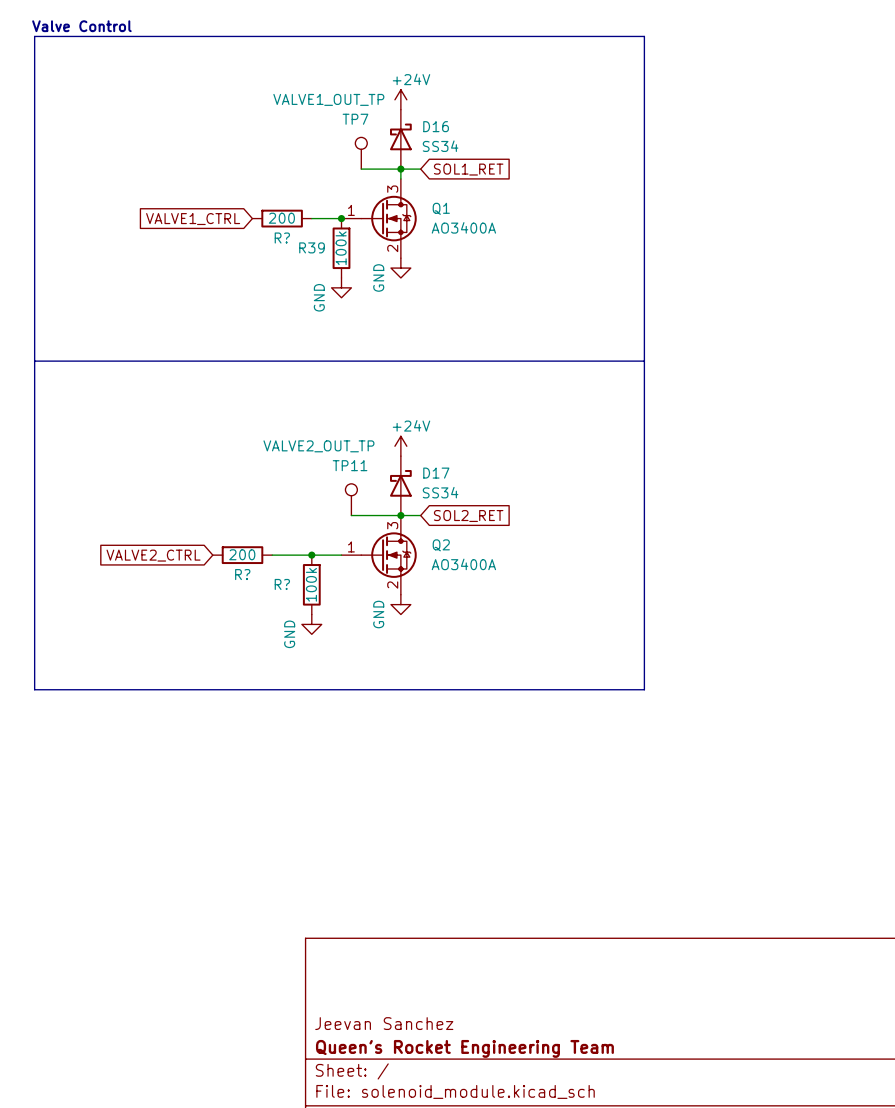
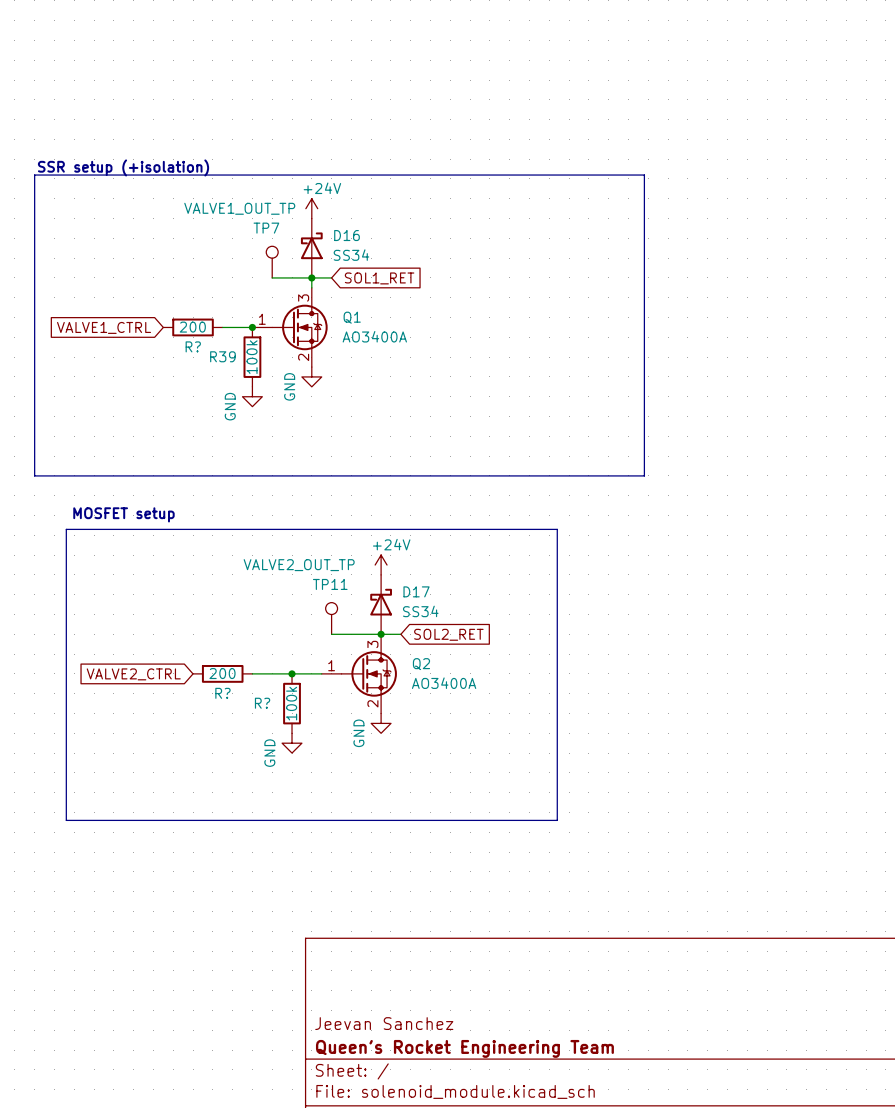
text: Valve Control (81, 26) -> none
power symbol: +24V (400, 99) -> none
D16 position: (400, 139) -> (311, 248)
TP7 position: (361, 153) -> (272, 262)
text: none -> SSR setup (+isolation) (123, 167)
wire: (361, 169) (420, 169) -> (272, 277) (331, 277)
wire: (400, 169) (400, 178) -> (311, 277) (311, 287)
junction: (400, 169) -> none
global label position: SOL1_RET (468, 169) -> SOL1_RET (379, 278)
line: (34, 175) (34, 36) (644, 36) (644, 175) -> (34, 175) (644, 175)
power symbol: none -> +24V (311, 208)
R?: 200 (282, 218) -> none
wire: (311, 218) (341, 218) -> (222, 327) (252, 327)
junction: (341, 218) -> none
Q1 position: (379, 218) -> (290, 327)
global label position: VALVE1_CTRL (193, 219) -> VALVE1_CTRL (104, 327)
R39 position: (341, 248) -> (252, 357)
power symbol: GND (400, 268) -> none
junction: none -> (311, 277)
power symbol: GND (341, 287) -> none
R?: none -> 200 (193, 327)
junction: none -> (252, 327)
line: (34, 361) (644, 361) -> none
power symbol: none -> GND (311, 376)
power symbol: none -> GND (252, 396)
power symbol position: +24V (400, 446) -> +24V (381, 565)
line: (34, 475) (34, 689) (644, 689) (644, 475) -> (34, 475) (644, 475)
D17 position: (400, 485) -> (381, 604)
TP11 position: (351, 499) -> (331, 618)
text: none -> MOSFET setup (123, 514)
wire: (351, 515) (420, 515) -> (331, 634) (400, 634)
junction: (400, 515) -> none
global label position: SOL2_RET (468, 516) -> SOL2_RET (448, 634)
line: none -> (66, 529) (557, 529) (557, 820) (66, 820) (66, 529)
global label position: VALVE2_CTRL (153, 555) -> VALVE2_CTRL (133, 674)
R?: 200 (242, 555) -> none
wire: (272, 555) (341, 555) -> (252, 673) (321, 673)
junction: (311, 555) -> none
Q2 position: (379, 555) -> (359, 673)
R? position: (311, 584) -> (292, 703)
power symbol: GND (400, 604) -> none
power symbol: GND (311, 624) -> none
junction: none -> (381, 634)
R?: none -> 200 (222, 673)
junction: none -> (292, 673)
power symbol: none -> GND (381, 723)
power symbol: none -> GND (292, 743)

